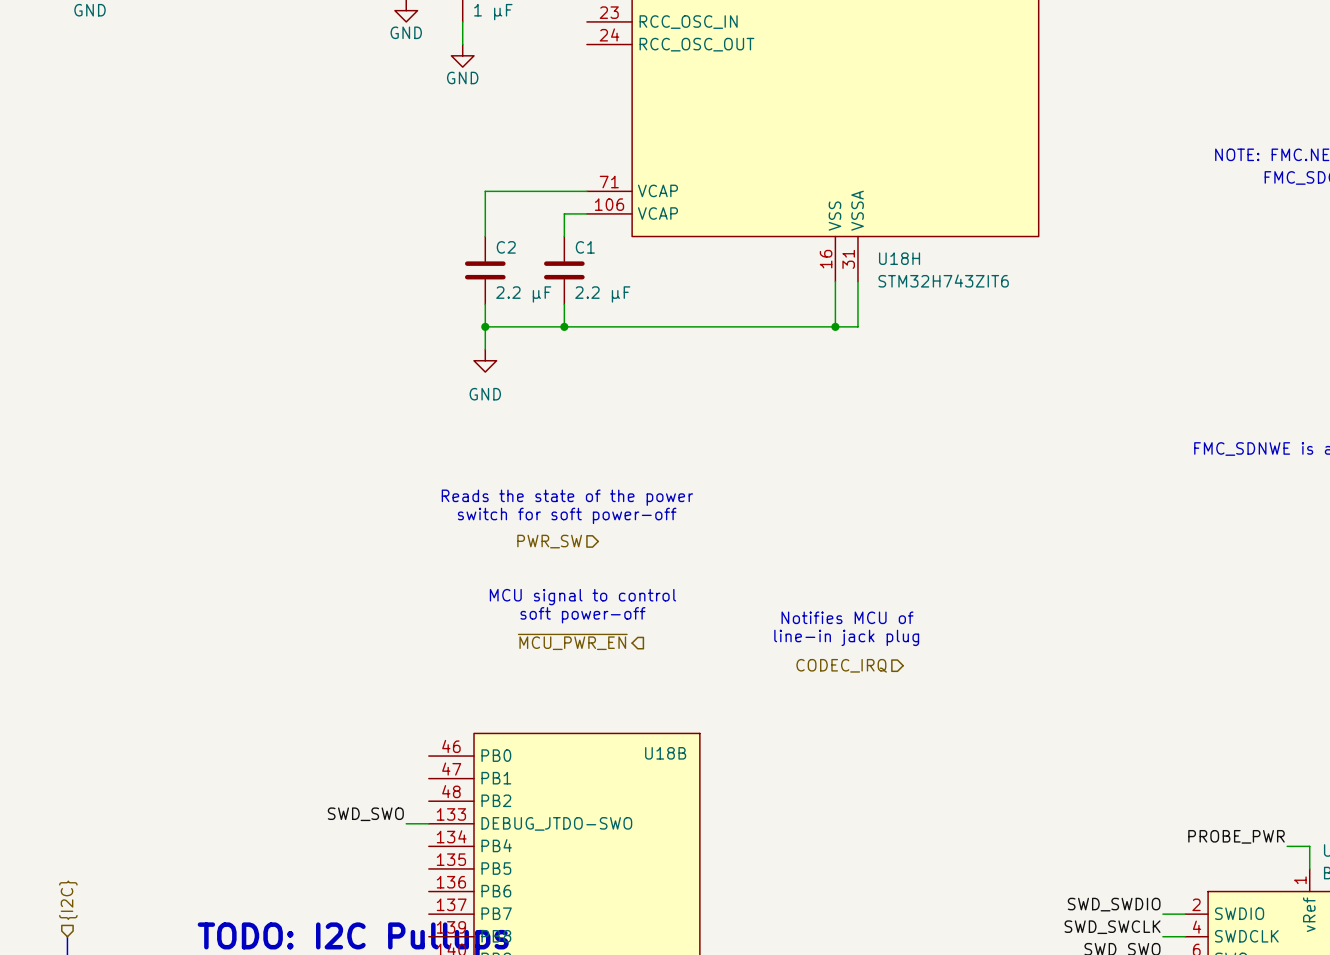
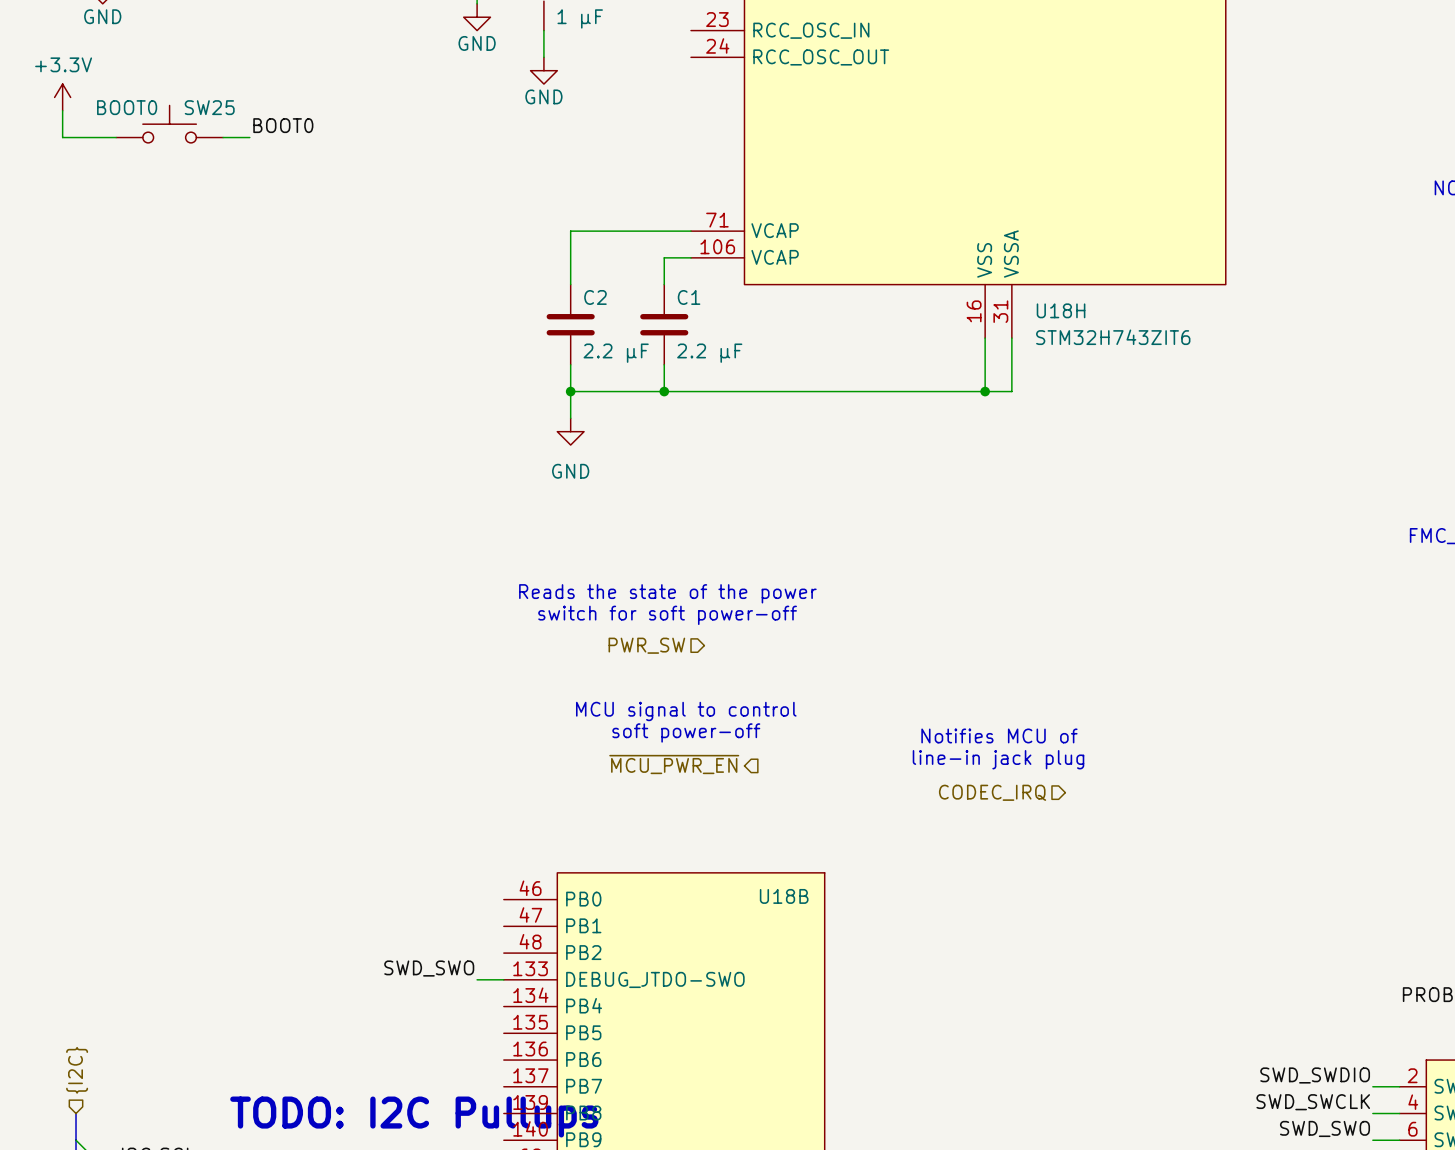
power symbol: none -> +3.3V (62, 97)
wire: none -> (62, 110) (62, 137) (116, 137)
SW25: none -> BOOT0 (169, 124)
label: none -> BOOT0 (283, 125)
wire: none -> (223, 137) (249, 137)

